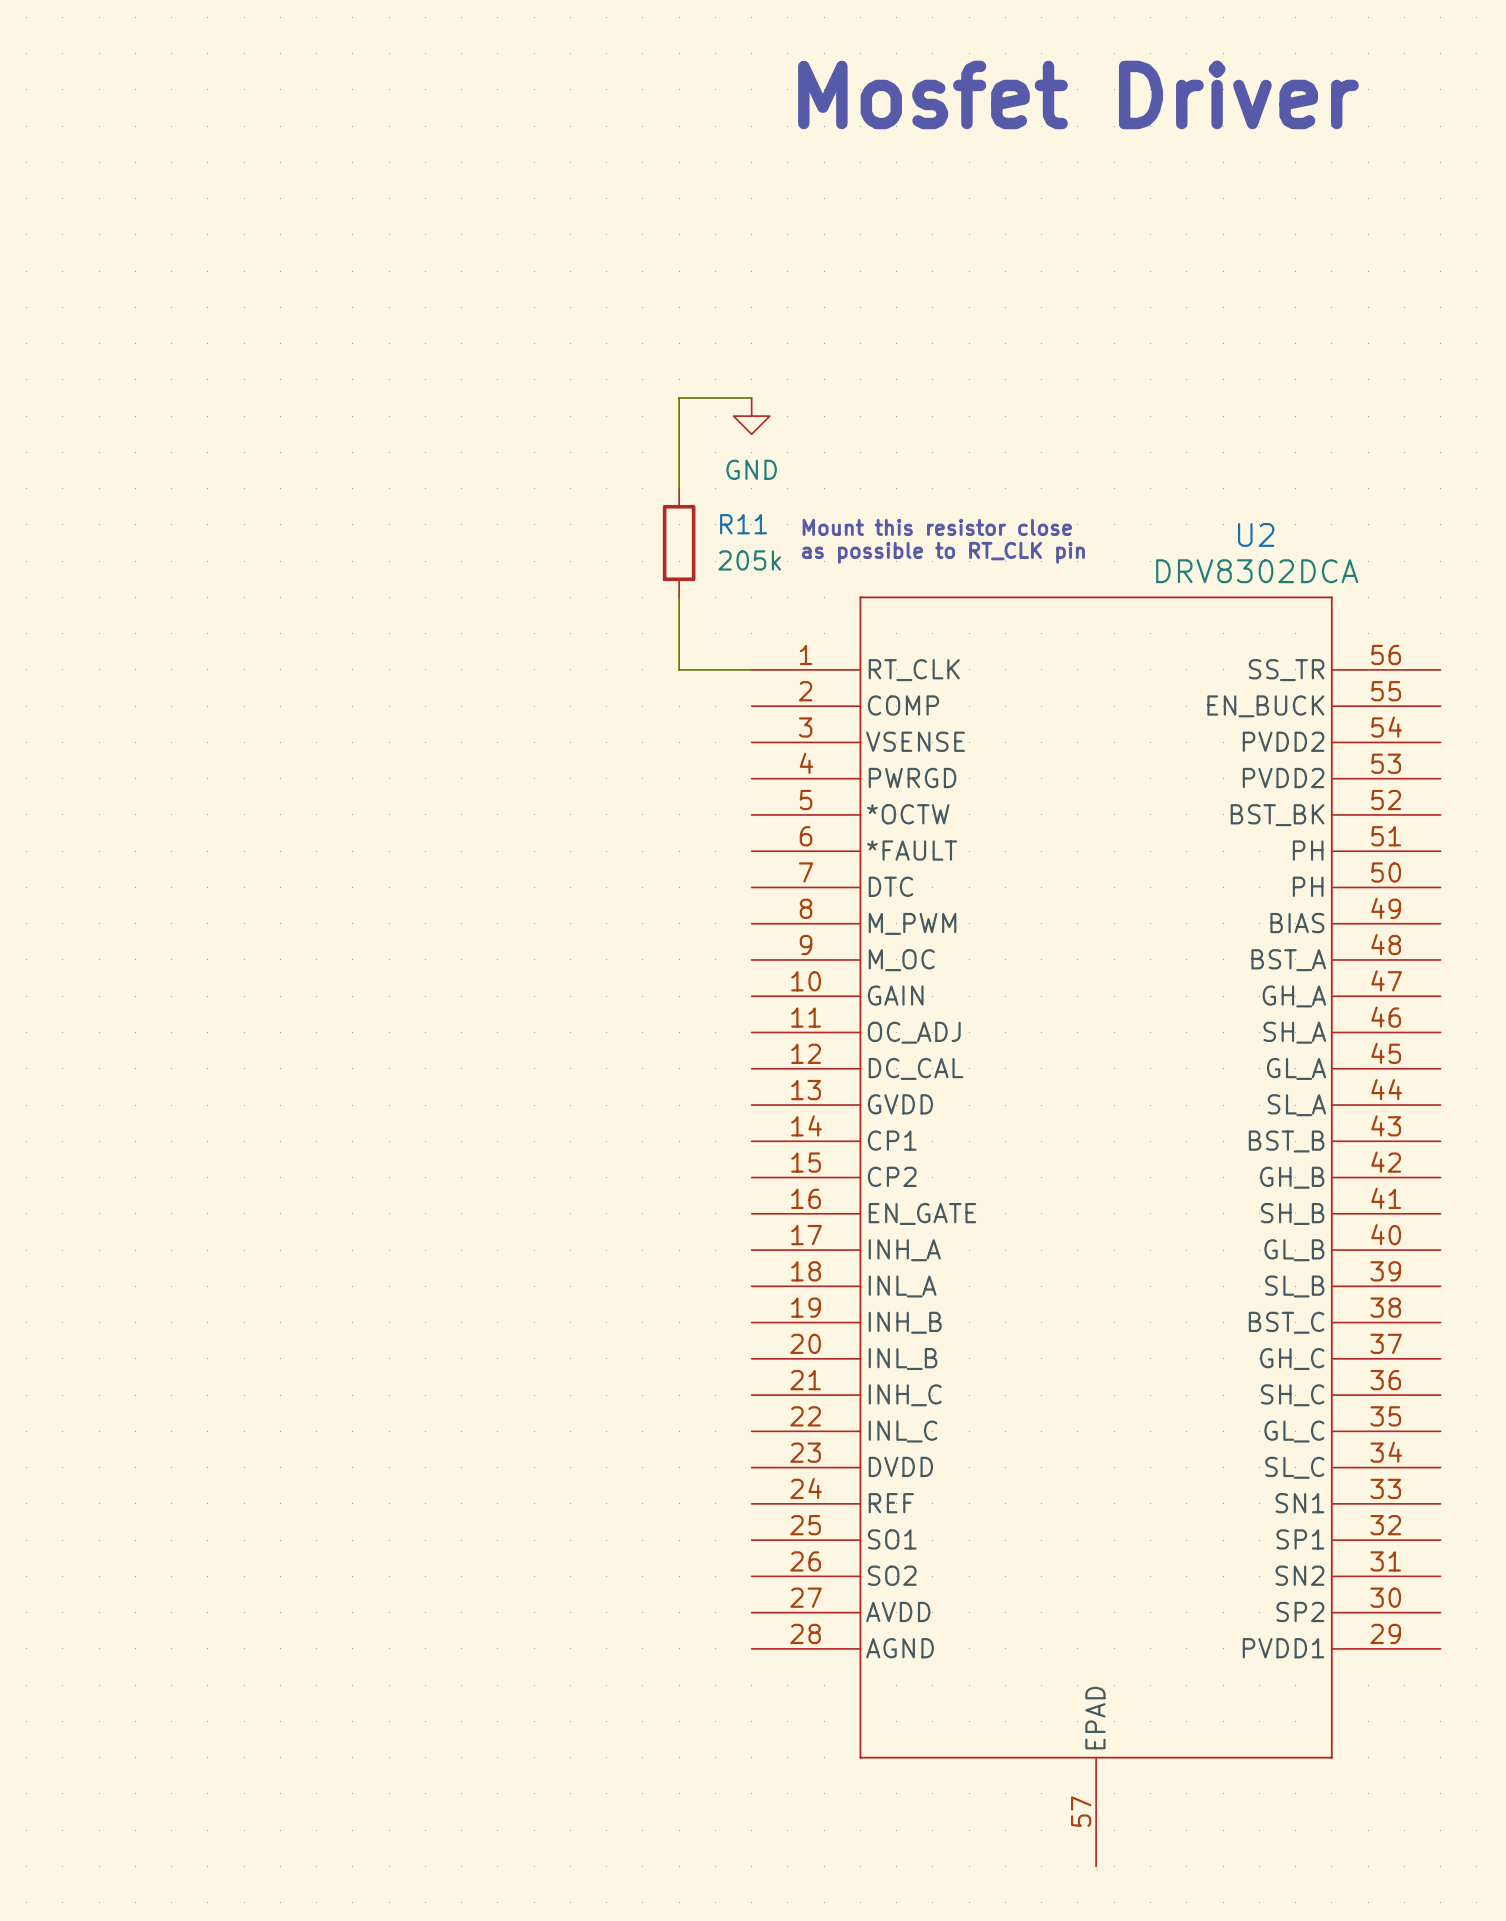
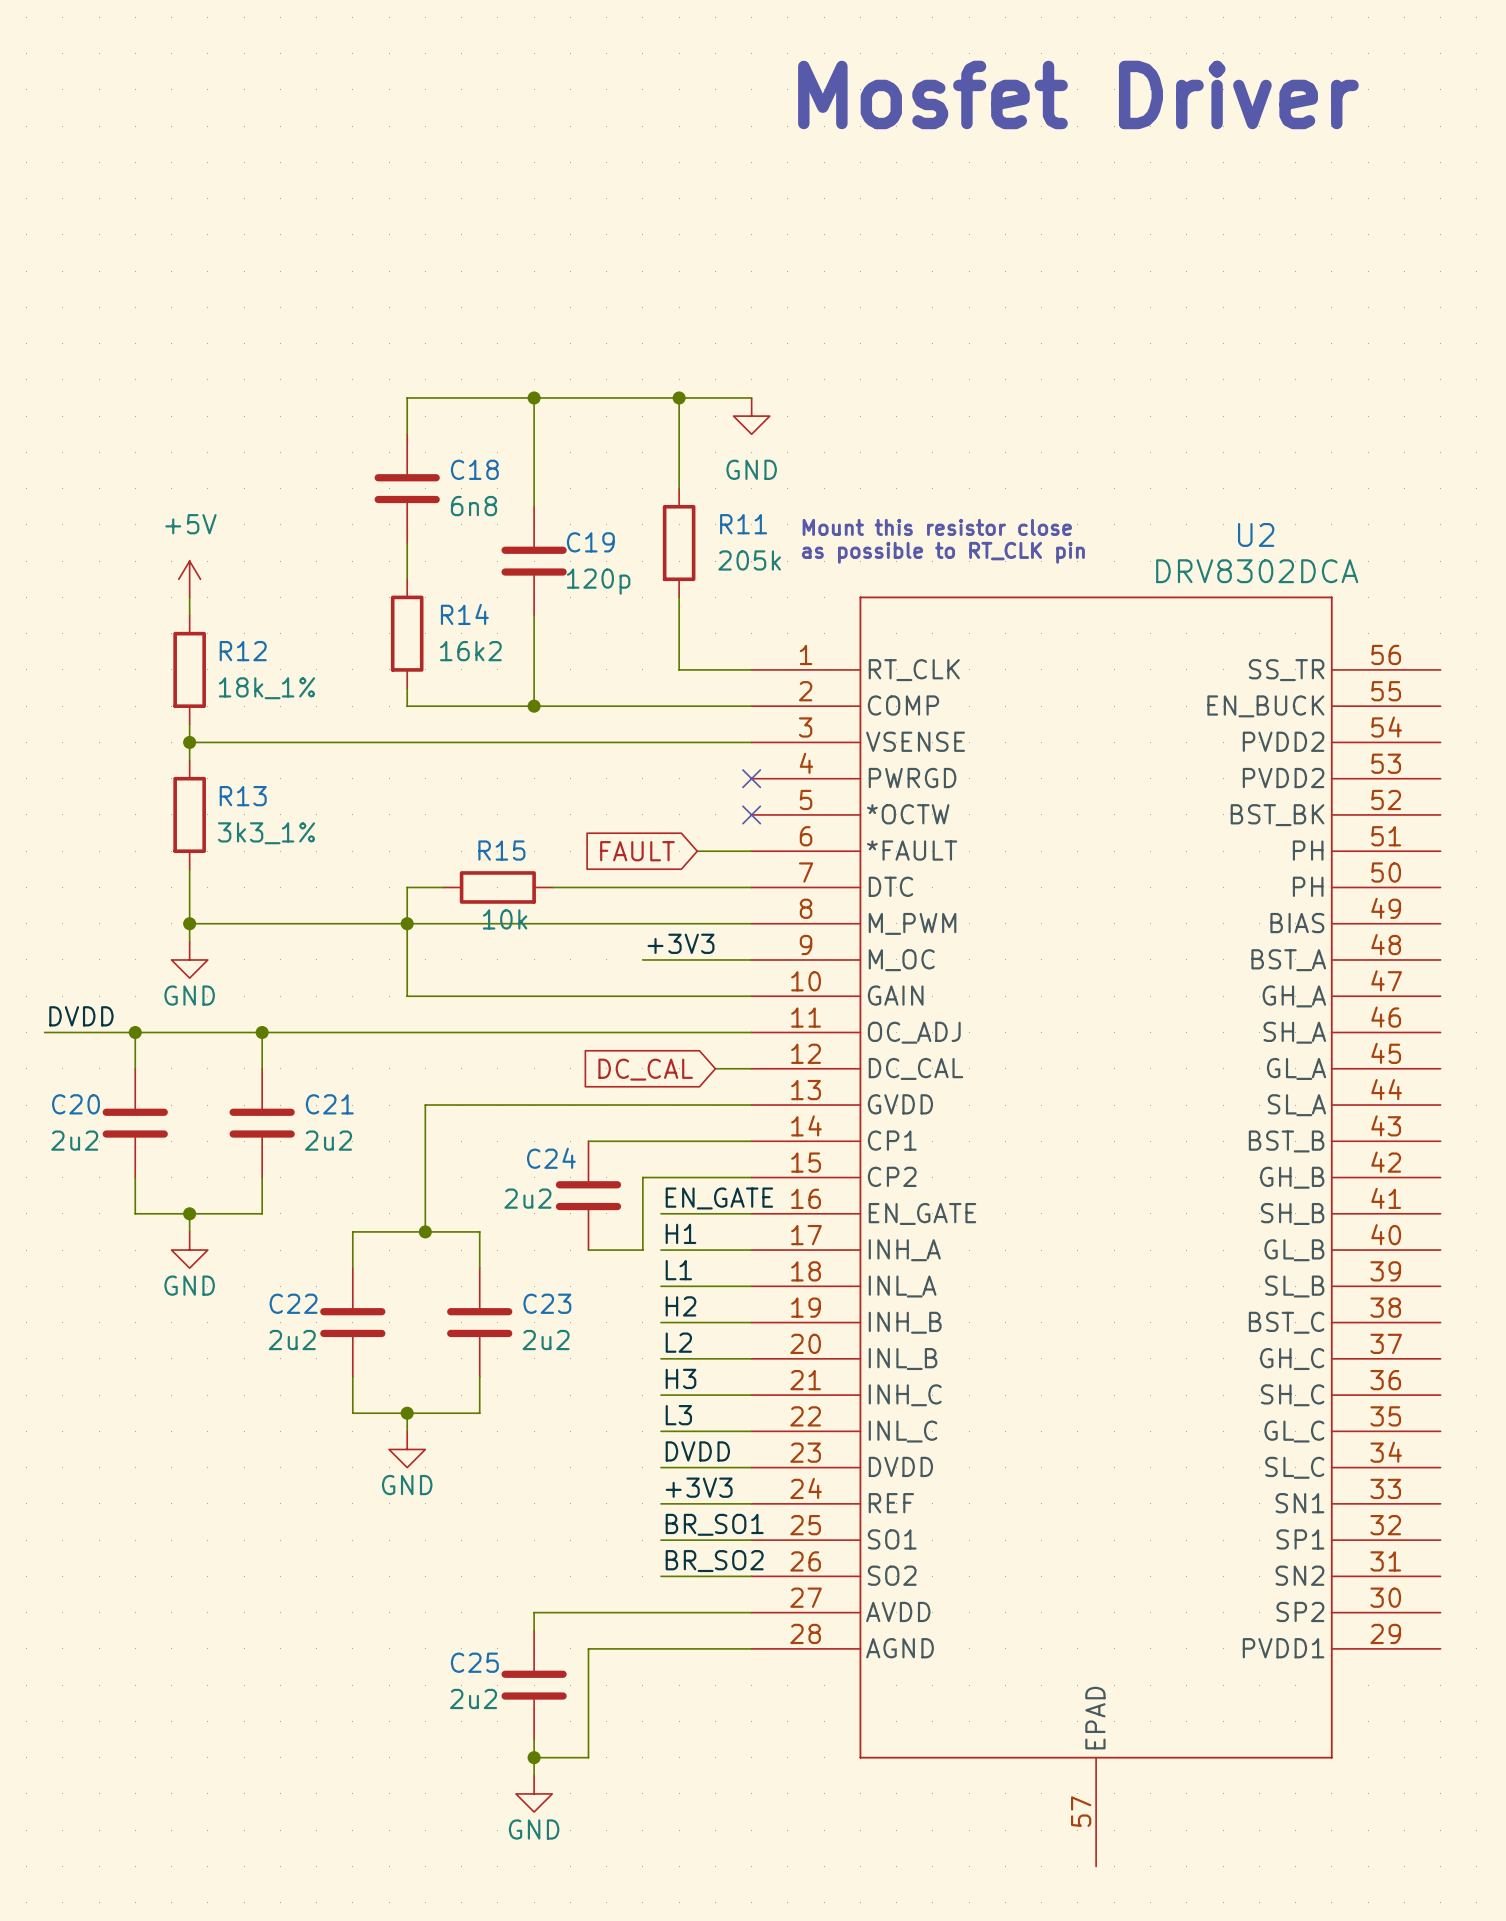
wire: none -> (534, 397) (534, 506)
junction: none -> (534, 397)
wire: none -> (679, 397) (407, 397) (407, 434)
junction: none -> (679, 397)
C18: none -> 6n8 (407, 488)
wire: none -> (407, 543) (407, 579)
C19: none -> 120p (534, 561)
power symbol: none -> +5V (189, 579)
wire: none -> (189, 597) (189, 615)
wire: none -> (534, 615) (534, 706)
R14: none -> 16k2 (407, 633)
R12: none -> 18k_1% (189, 669)
wire: none -> (407, 688) (407, 706) (751, 706)
junction: none -> (534, 706)
wire: none -> (189, 724) (189, 760)
wire: none -> (189, 742) (751, 742)
junction: none -> (189, 742)
no-connect mark: none -> (751, 778)
R13: none -> 3k3_1% (189, 814)
no-connect mark: none -> (751, 814)
global label: none -> FAULT (637, 851)
wire: none -> (697, 851) (751, 851)
wire: none -> (189, 869) (189, 941)
wire: none -> (443, 887) (407, 887) (407, 996) (751, 996)
R15: none -> 10k (497, 887)
wire: none -> (552, 887) (751, 887)
wire: none -> (189, 923) (751, 923)
junction: none -> (189, 923)
junction: none -> (407, 923)
label: none -> +3V3 (680, 943)
power symbol: none -> GND (189, 959)
wire: none -> (642, 959) (751, 959)
label: none -> DVDD (81, 1016)
wire: none -> (44, 1032) (751, 1032)
wire: none -> (135, 1032) (135, 1068)
junction: none -> (135, 1032)
wire: none -> (262, 1032) (262, 1068)
junction: none -> (262, 1032)
wire: none -> (715, 1068) (751, 1068)
global label: none -> DC_CAL (645, 1069)
wire: none -> (751, 1105) (425, 1105) (425, 1231)
C20: none -> 2u2 (135, 1123)
C21: none -> 2u2 (262, 1123)
wire: none -> (588, 1141) (751, 1141)
wire: none -> (135, 1177) (135, 1213) (262, 1213) (262, 1177)
wire: none -> (751, 1177) (642, 1177) (642, 1250) (588, 1250)
C24: none -> 2u2 (588, 1195)
label: none -> EN_GATE (719, 1198)
wire: none -> (189, 1213) (189, 1231)
junction: none -> (189, 1213)
wire: none -> (661, 1213) (751, 1213)
junction: none -> (425, 1231)
label: none -> H1 (680, 1233)
power symbol: none -> GND (189, 1250)
wire: none -> (661, 1250) (751, 1250)
wire: none -> (352, 1268) (352, 1231) (479, 1231) (479, 1268)
label: none -> L1 (678, 1270)
wire: none -> (661, 1286) (751, 1286)
label: none -> H2 (680, 1306)
C22: none -> 2u2 (352, 1322)
C23: none -> 2u2 (479, 1322)
wire: none -> (661, 1322) (751, 1322)
label: none -> L2 (678, 1342)
wire: none -> (661, 1358) (751, 1358)
wire: none -> (352, 1376) (352, 1413) (479, 1413) (479, 1376)
label: none -> H3 (680, 1378)
wire: none -> (661, 1395) (751, 1395)
wire: none -> (407, 1413) (407, 1431)
junction: none -> (407, 1413)
label: none -> L3 (678, 1415)
wire: none -> (661, 1431) (751, 1431)
power symbol: none -> GND (407, 1449)
label: none -> DVDD (697, 1451)
wire: none -> (661, 1467) (751, 1467)
label: none -> +3V3 (699, 1487)
wire: none -> (661, 1503) (751, 1503)
label: none -> BR_SO1 (714, 1524)
wire: none -> (661, 1540) (751, 1540)
label: none -> BR_SO2 (714, 1561)
wire: none -> (661, 1576) (751, 1576)
wire: none -> (751, 1612) (534, 1612) (534, 1630)
wire: none -> (751, 1648) (588, 1648) (588, 1757) (534, 1757)
C25: none -> 2u2 (534, 1685)
wire: none -> (534, 1739) (534, 1775)
junction: none -> (534, 1757)
power symbol: none -> GND (534, 1793)

